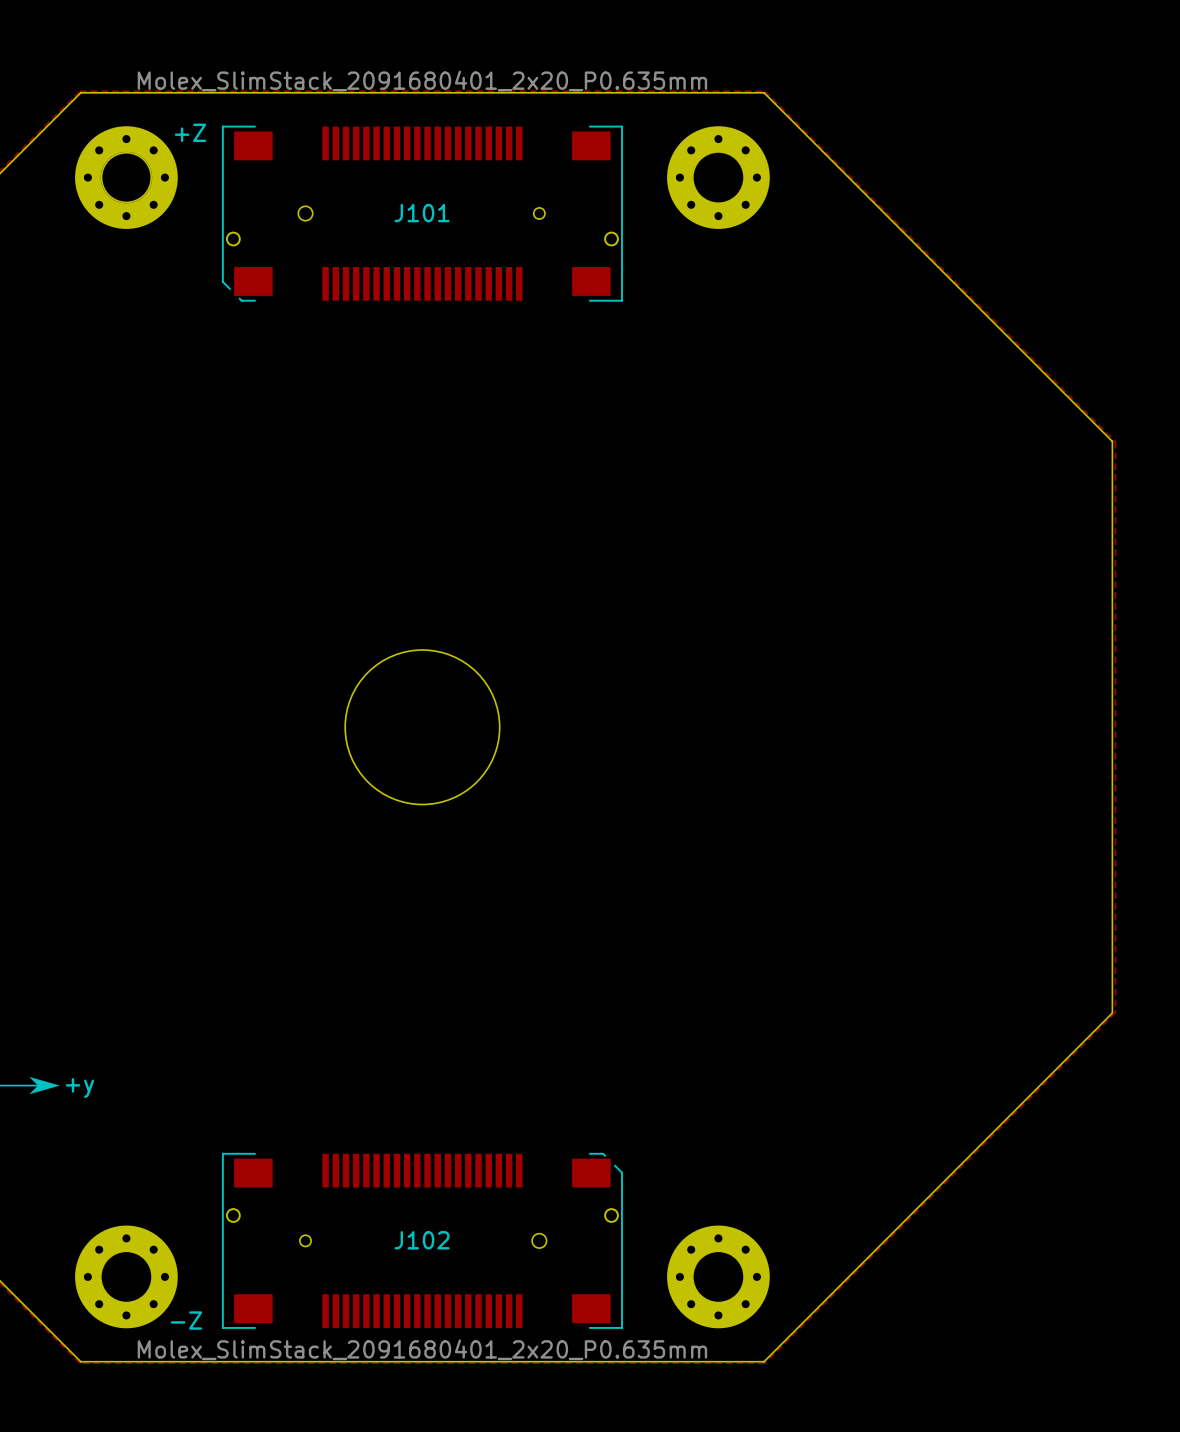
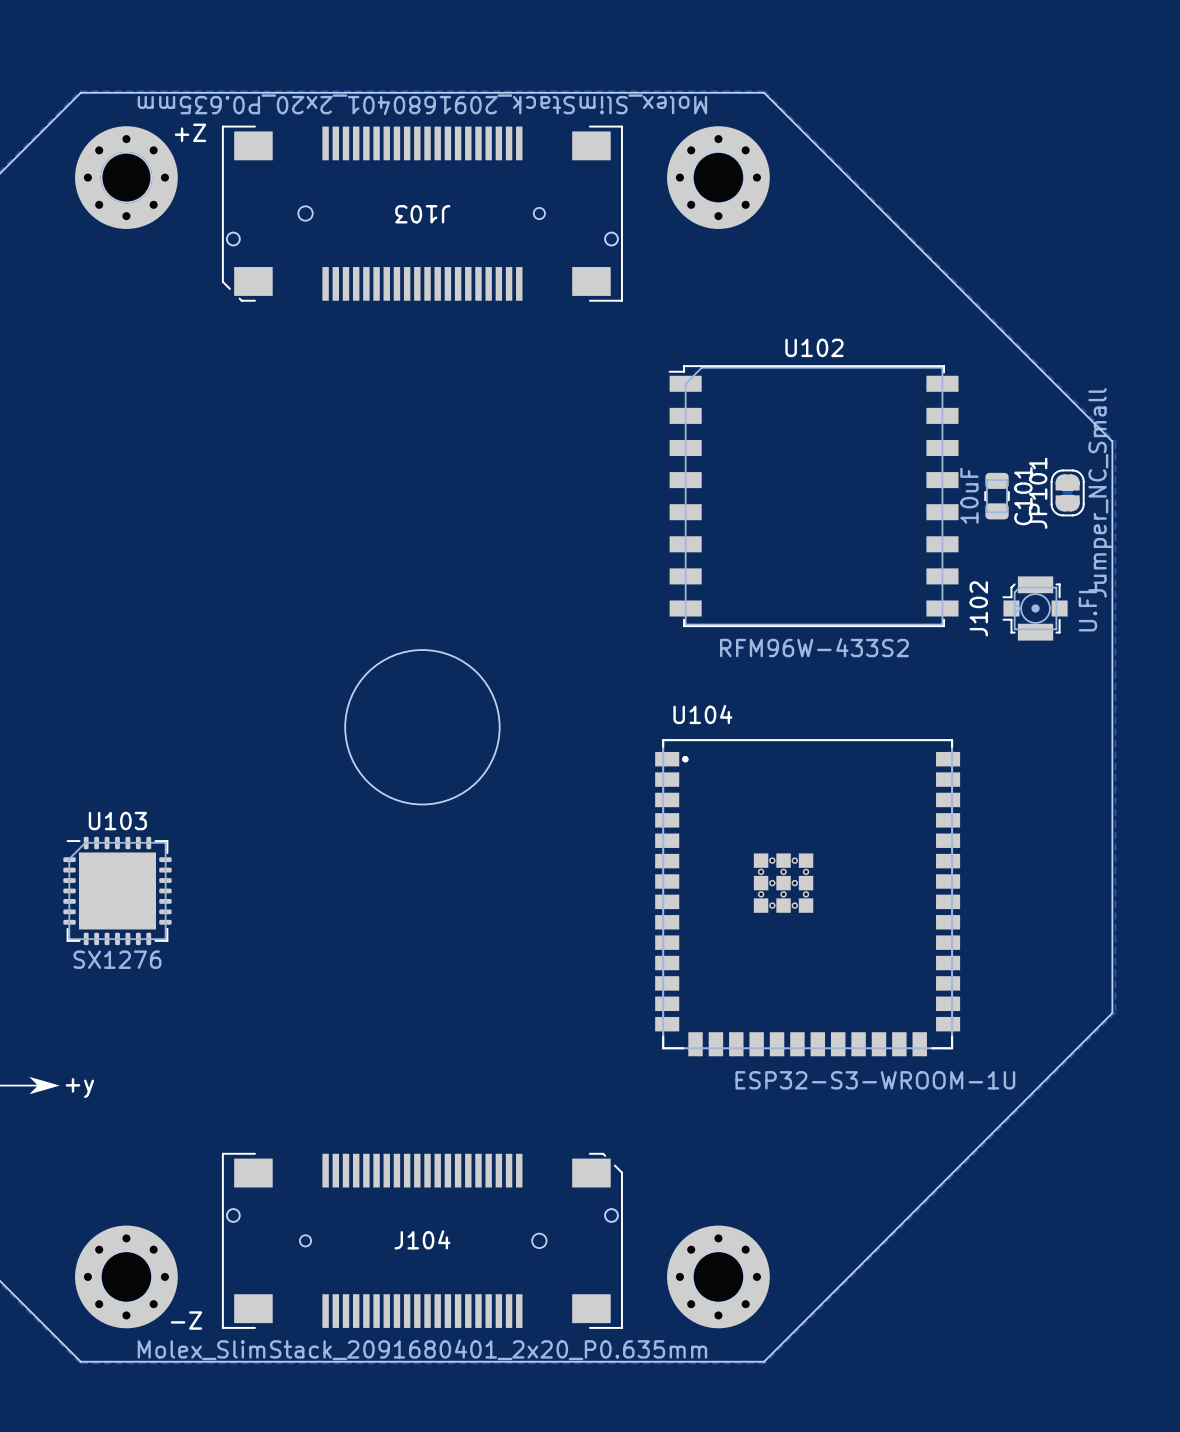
J101 value rotation: 0° (422, 81) -> 180° (422, 104)
J101 name: J101 (422, 213) -> J103 (422, 214)
JP101: none -> Jumper_NC_Small (1067, 492)
U102: none -> RFM96W-433S2 (813, 496)
C101: none -> 10uF (997, 496)
J102: none -> U.FL (1035, 608)
U103: none -> SX1276 (117, 890)
U104: none -> ESP32-S3-WROOM-1U (807, 897)
J102 name: J102 (422, 1240) -> J104 (422, 1239)

